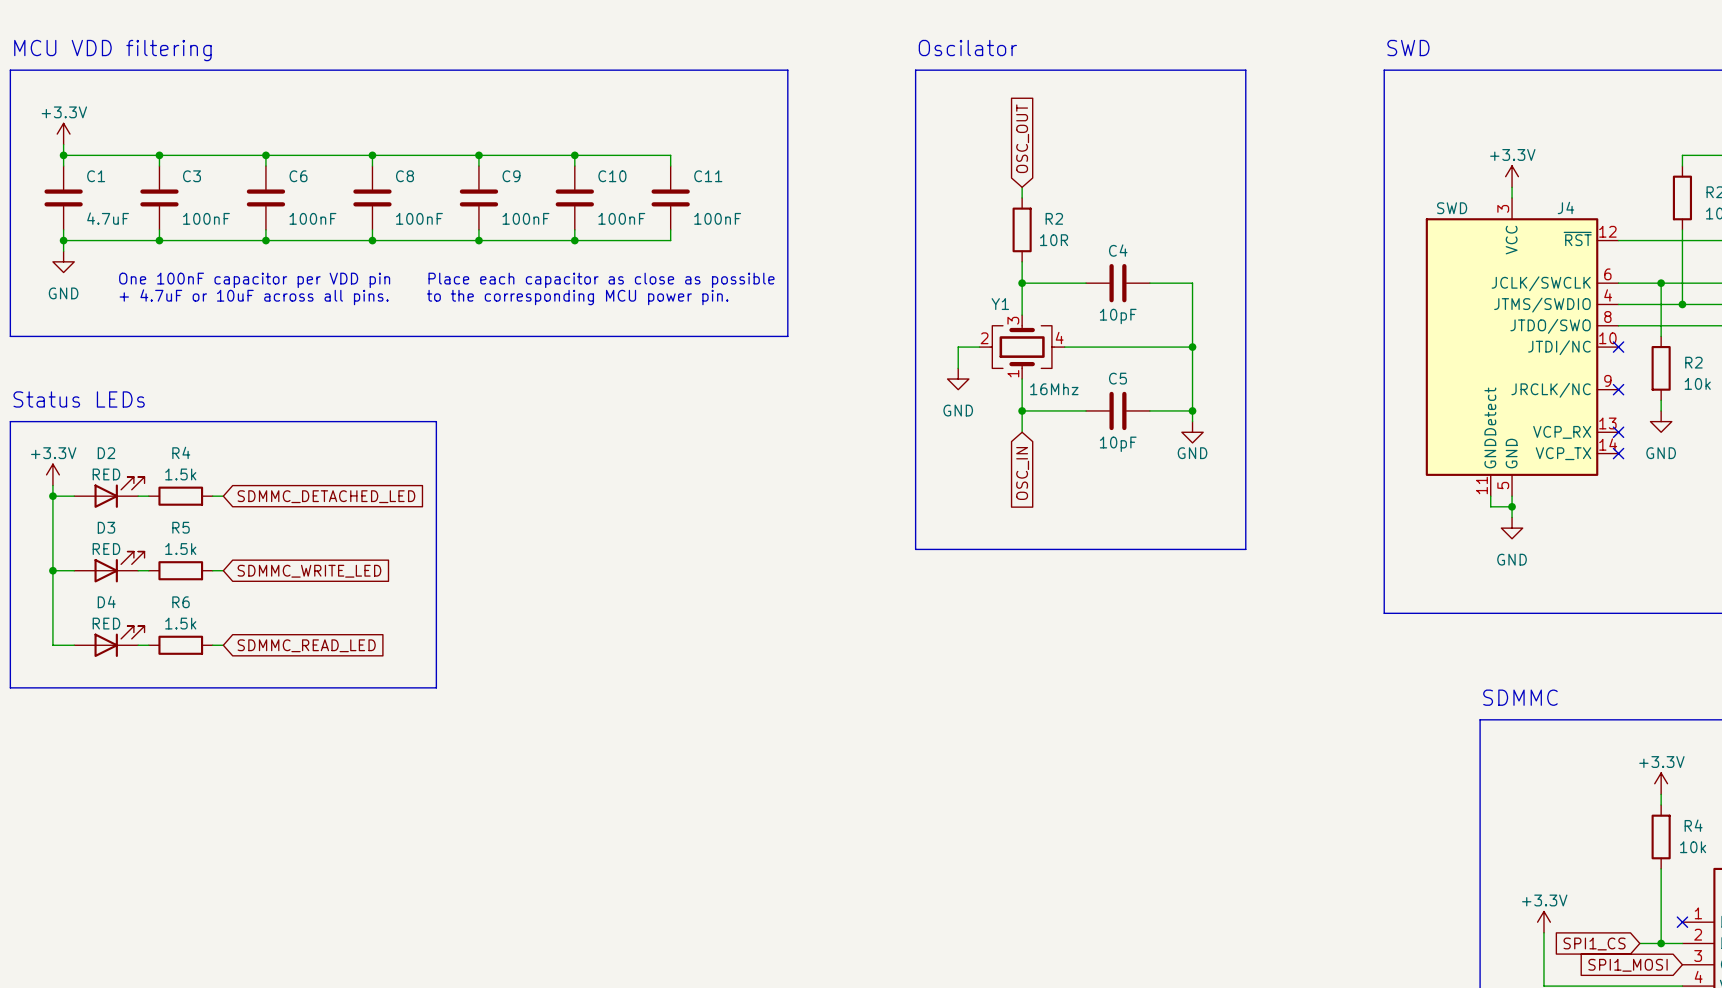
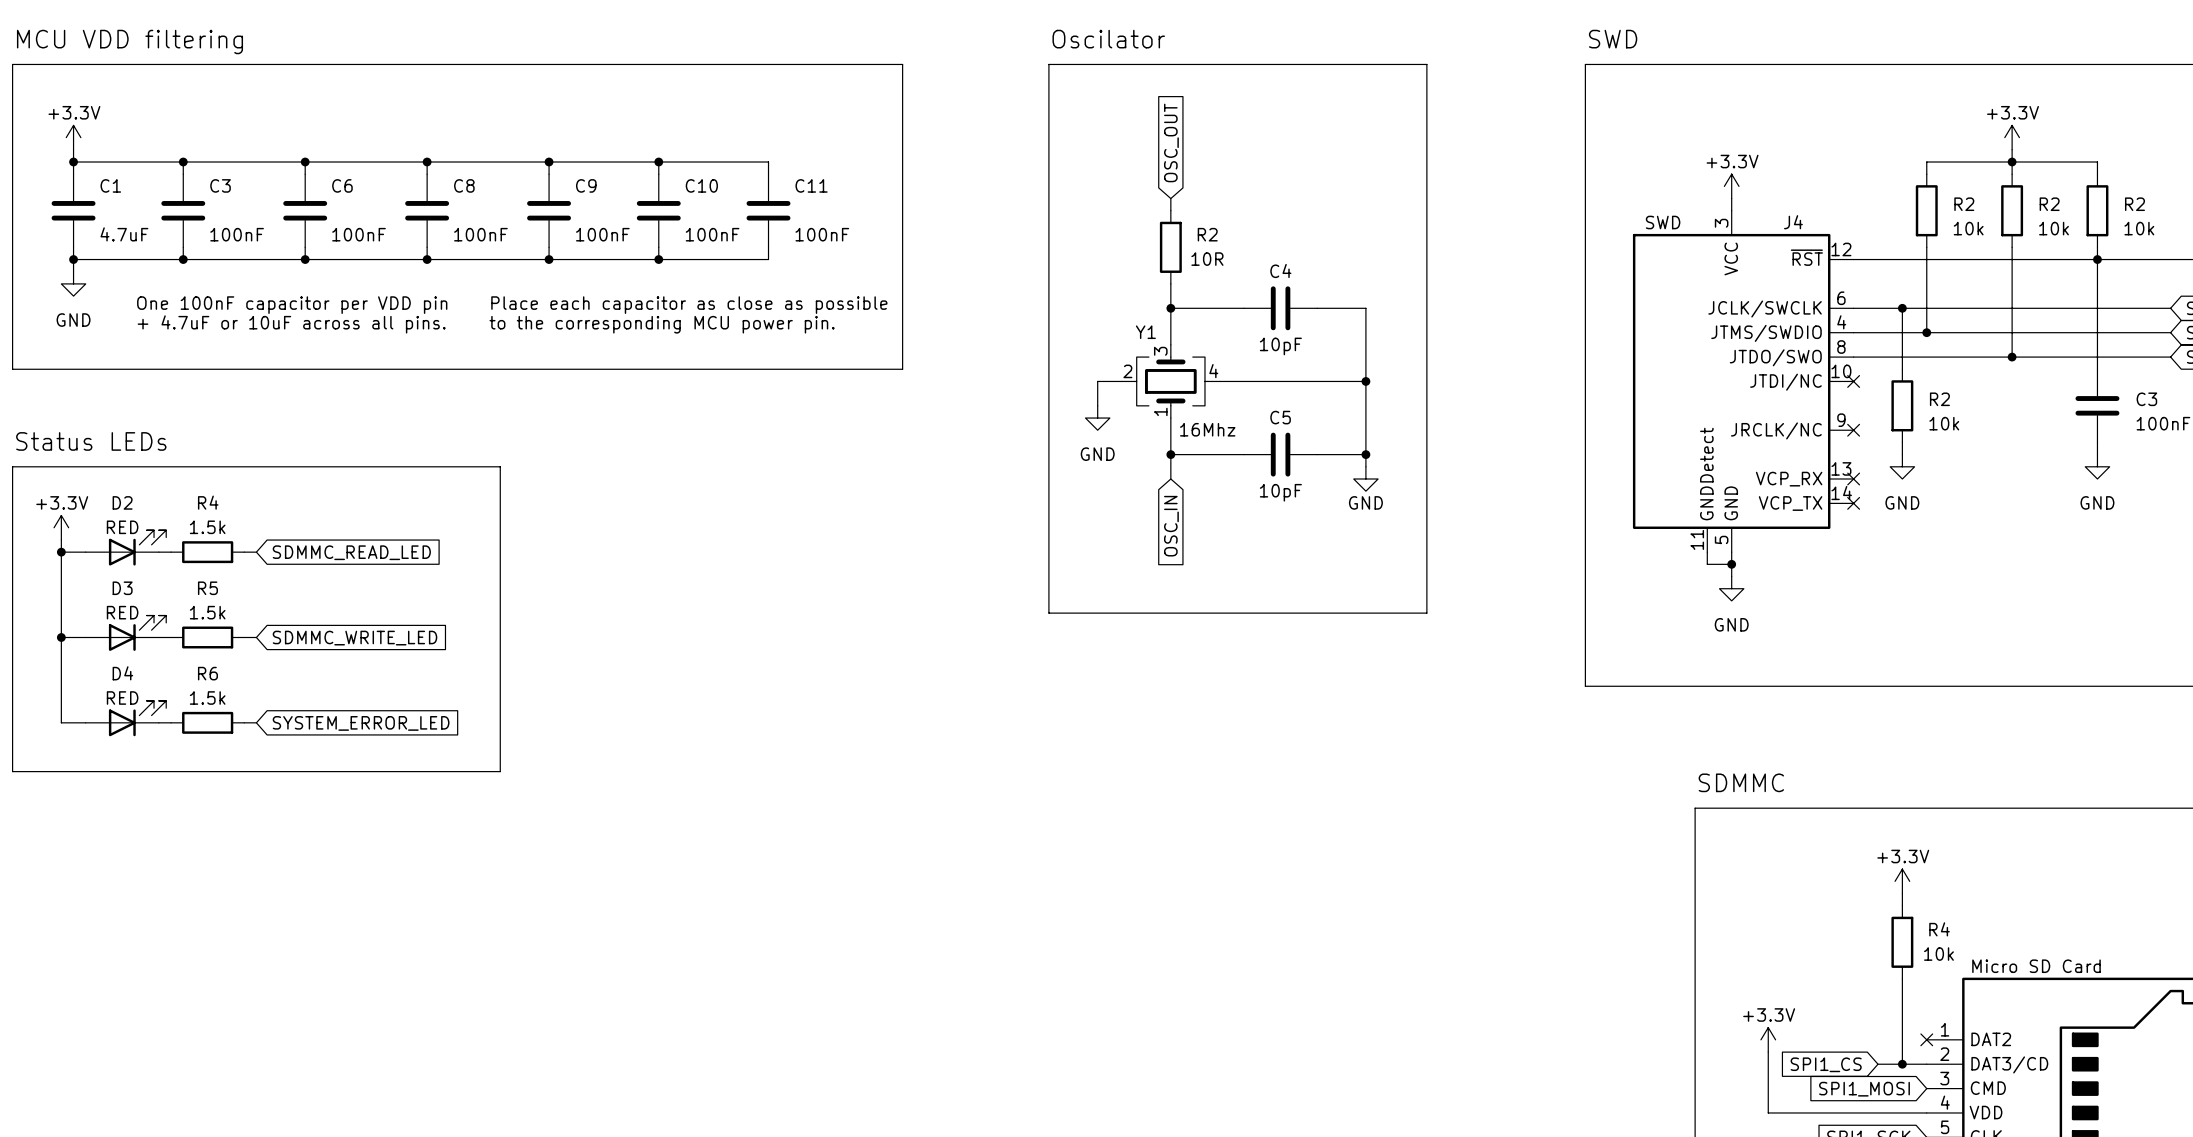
global label: SDMMC_DETACHED_LED (326, 496) -> SDMMC_READ_LED (351, 552)
global label: SDMMC_READ_LED (306, 645) -> SYSTEM_ERROR_LED (361, 723)

